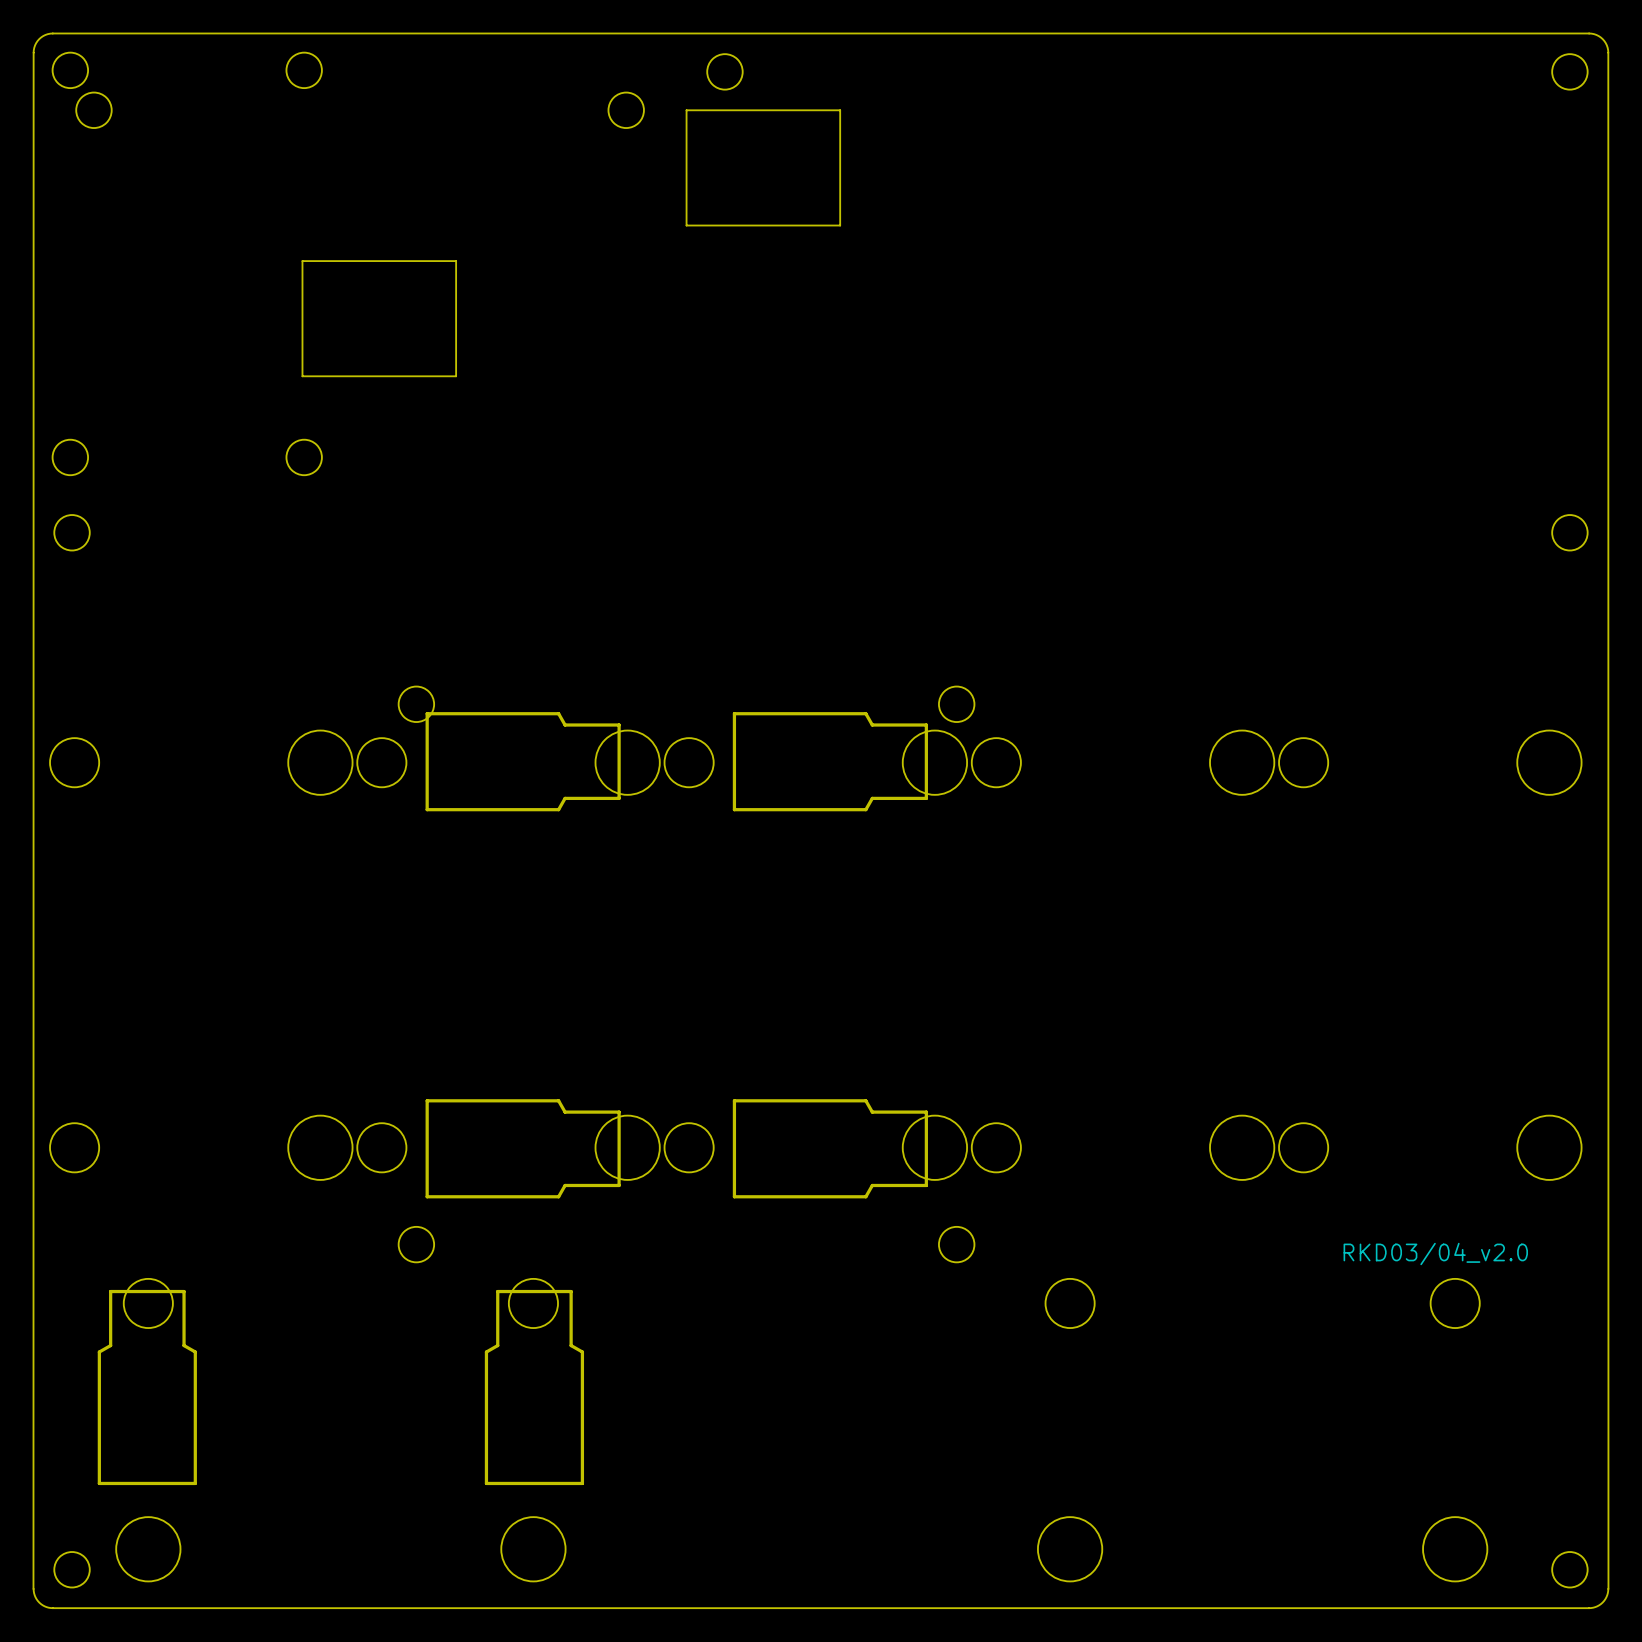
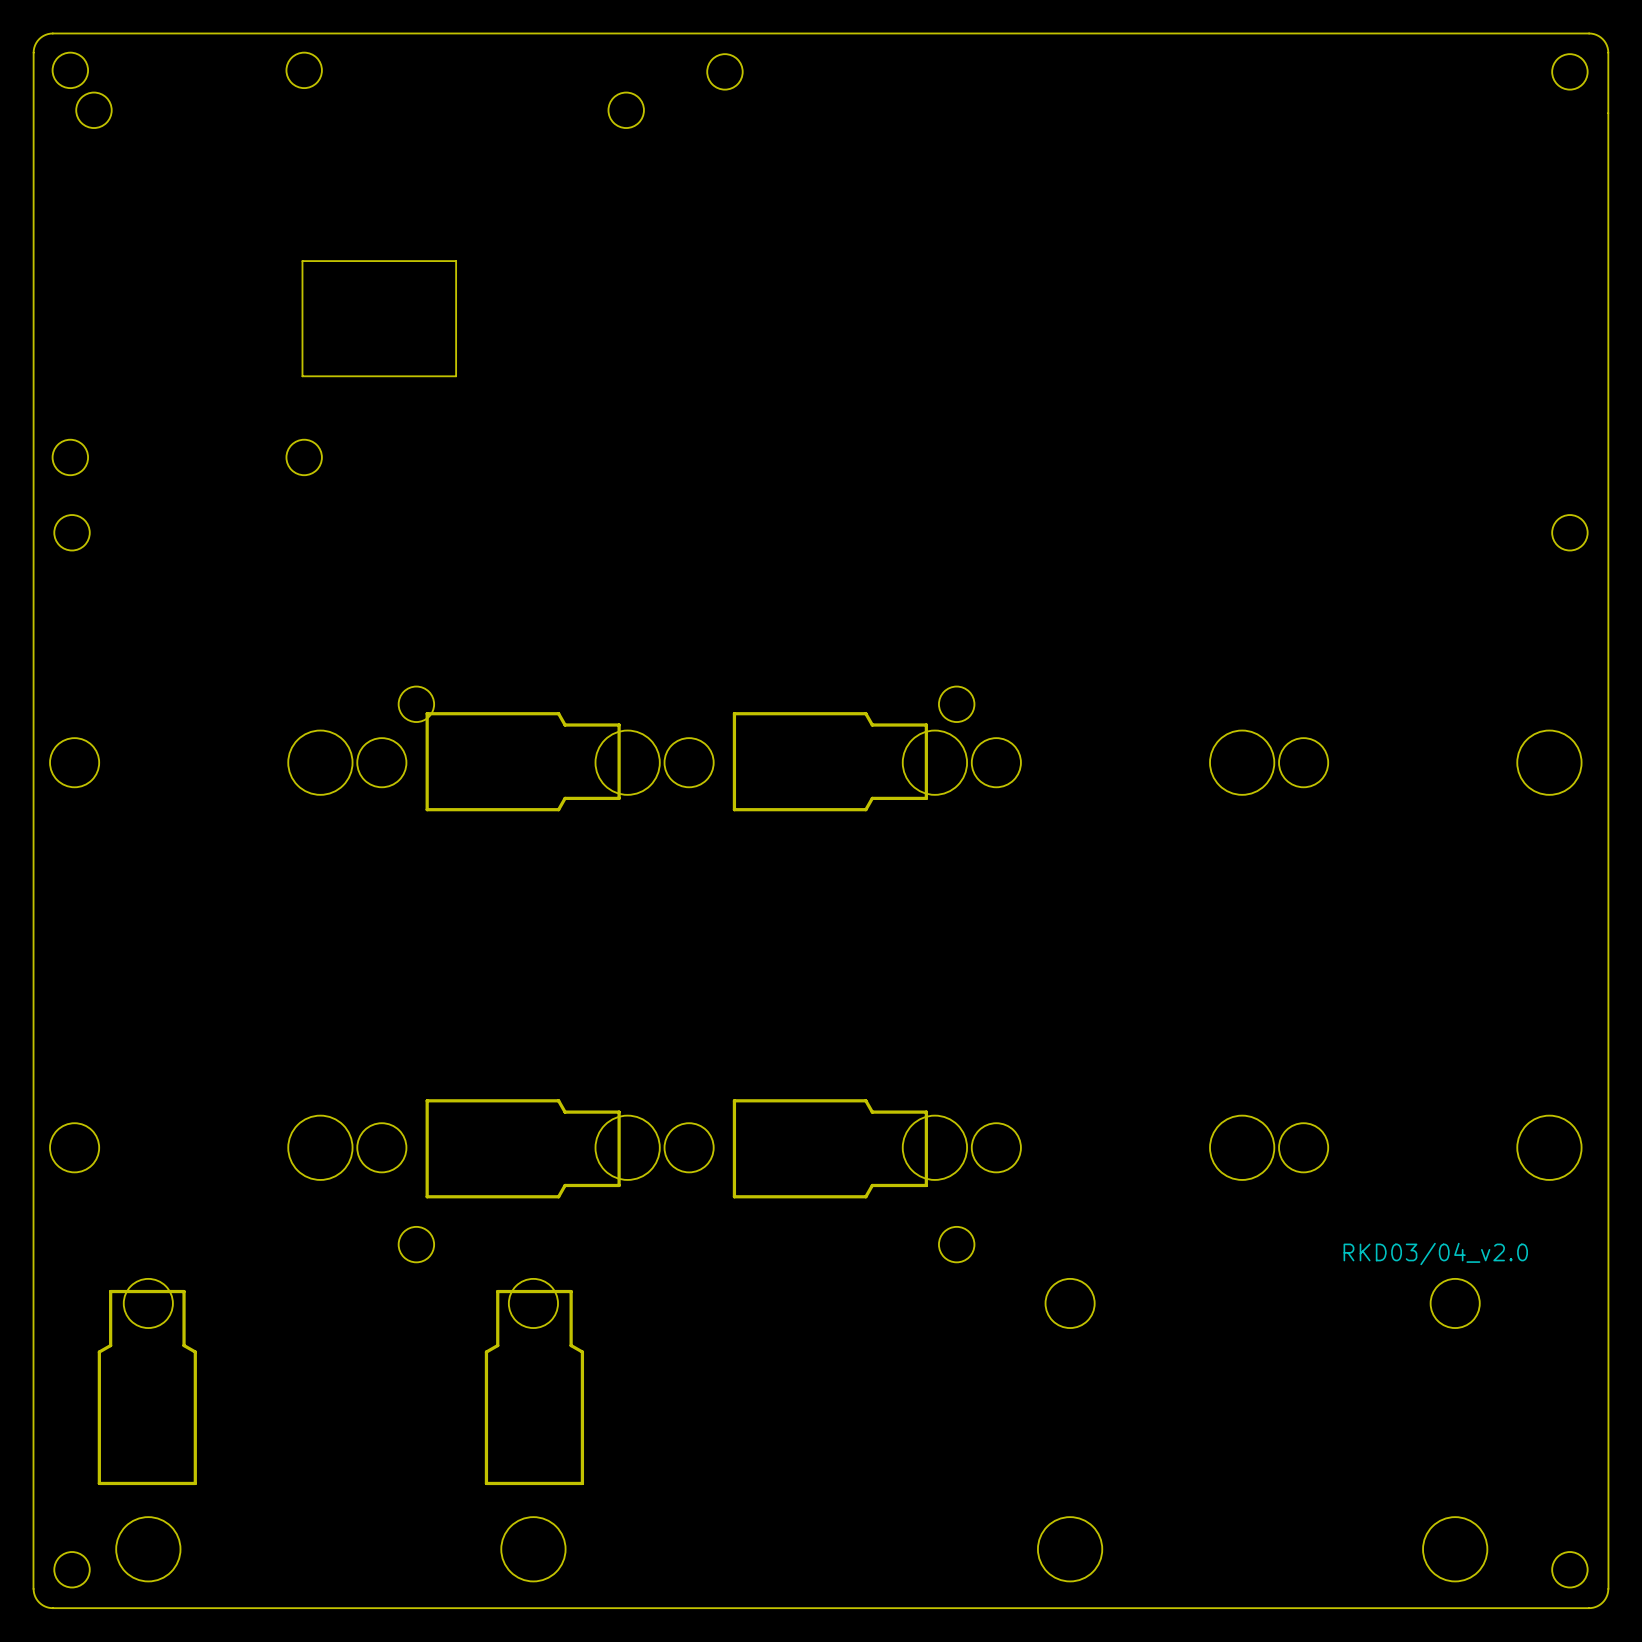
board edge: (840, 110) (686, 110) (686, 225) (840, 225) (840, 110) -> none

